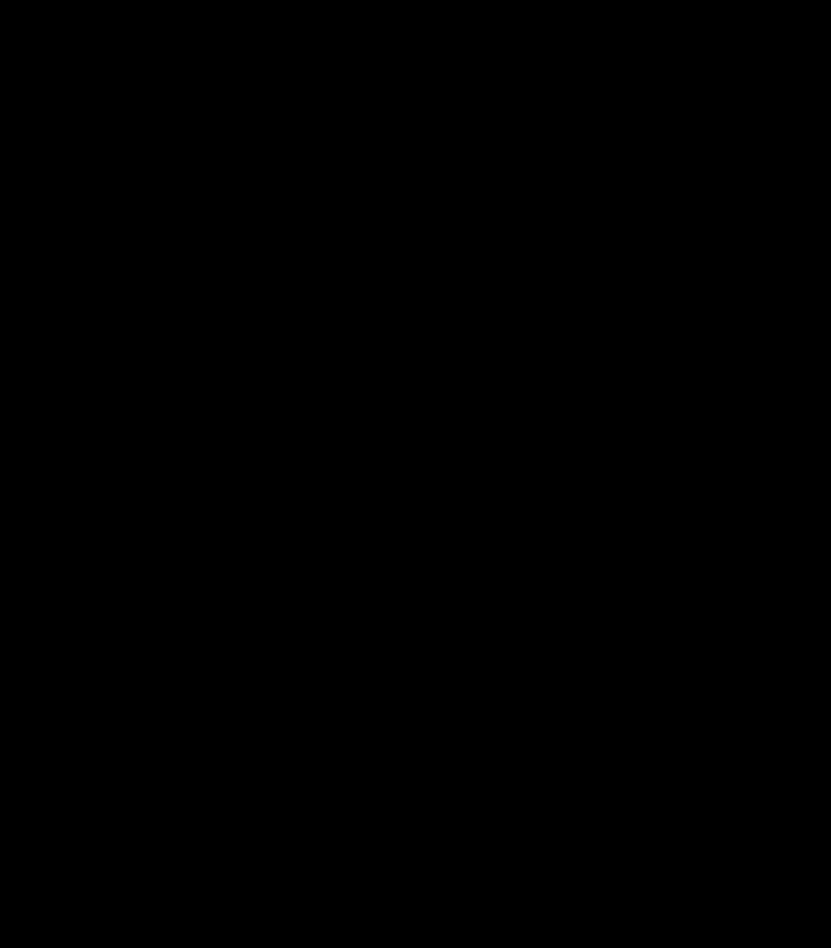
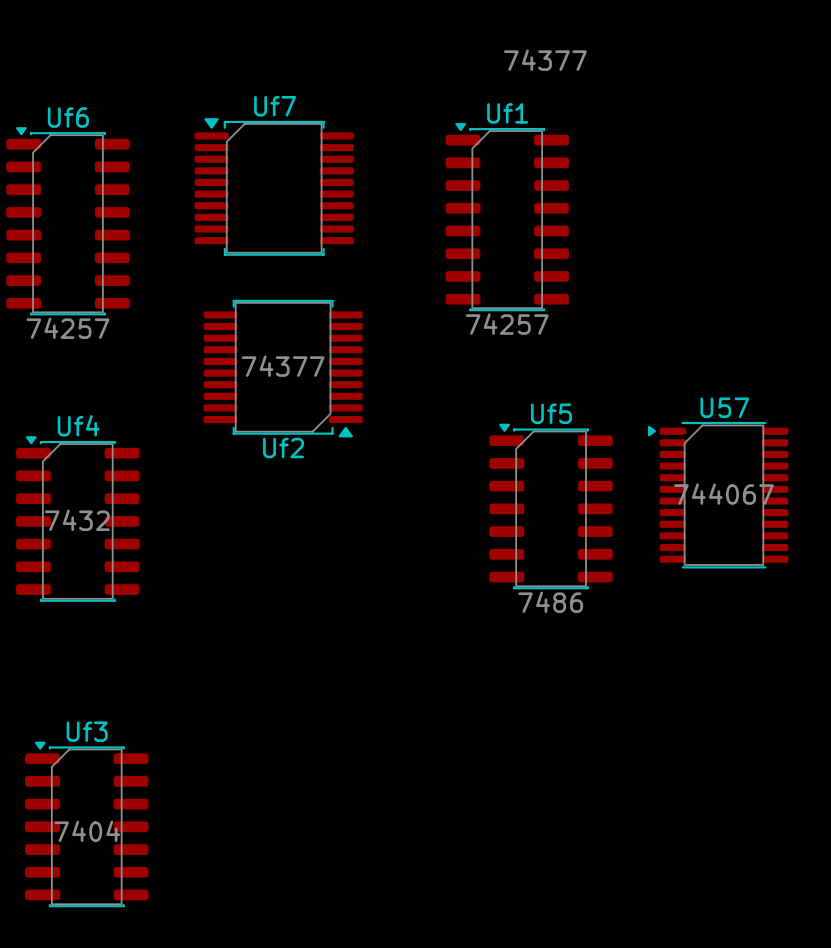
Uf7: none -> 74377 (274, 186)
Uf1: none -> 74257 (507, 217)
Uf6: none -> 74257 (67, 221)
Uf2: none -> 74377 (283, 368)
U57: none -> 744067 (718, 495)
Uf5: none -> 7486 (551, 506)
Uf4: none -> 7432 (77, 519)
Uf3: none -> 7404 (86, 824)

